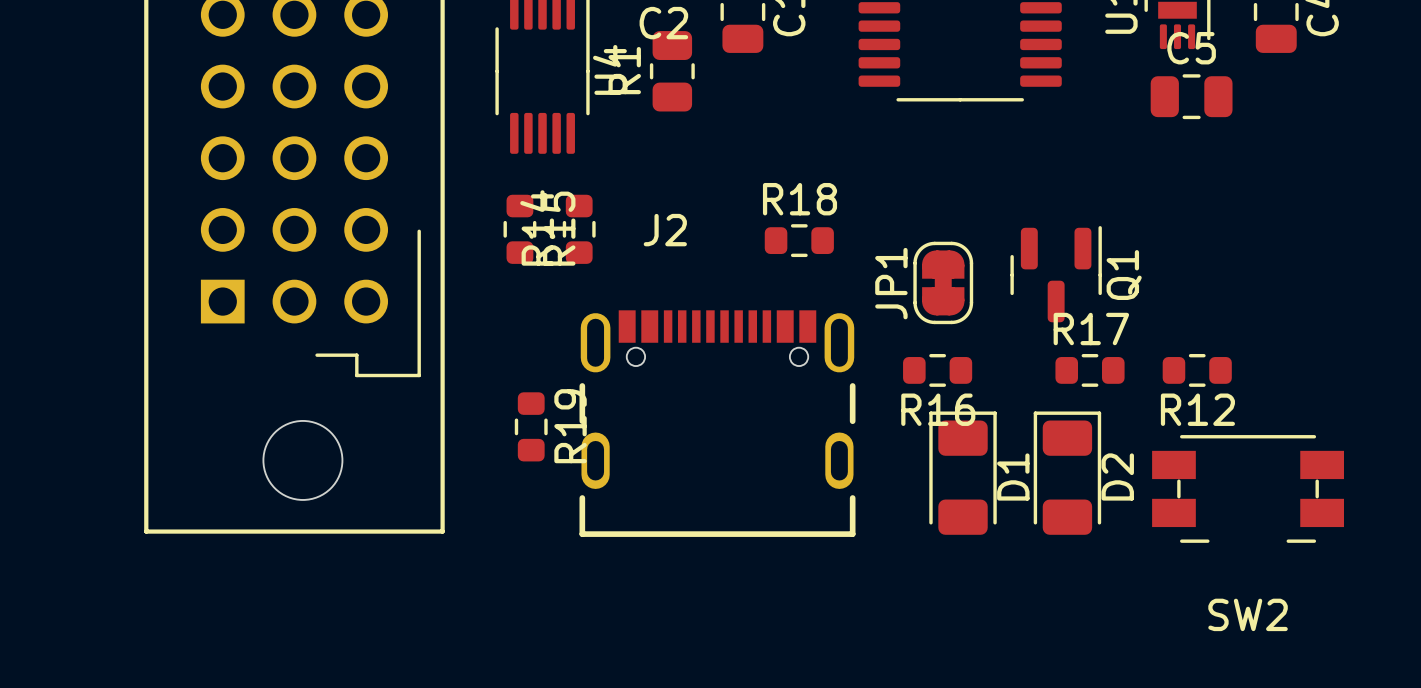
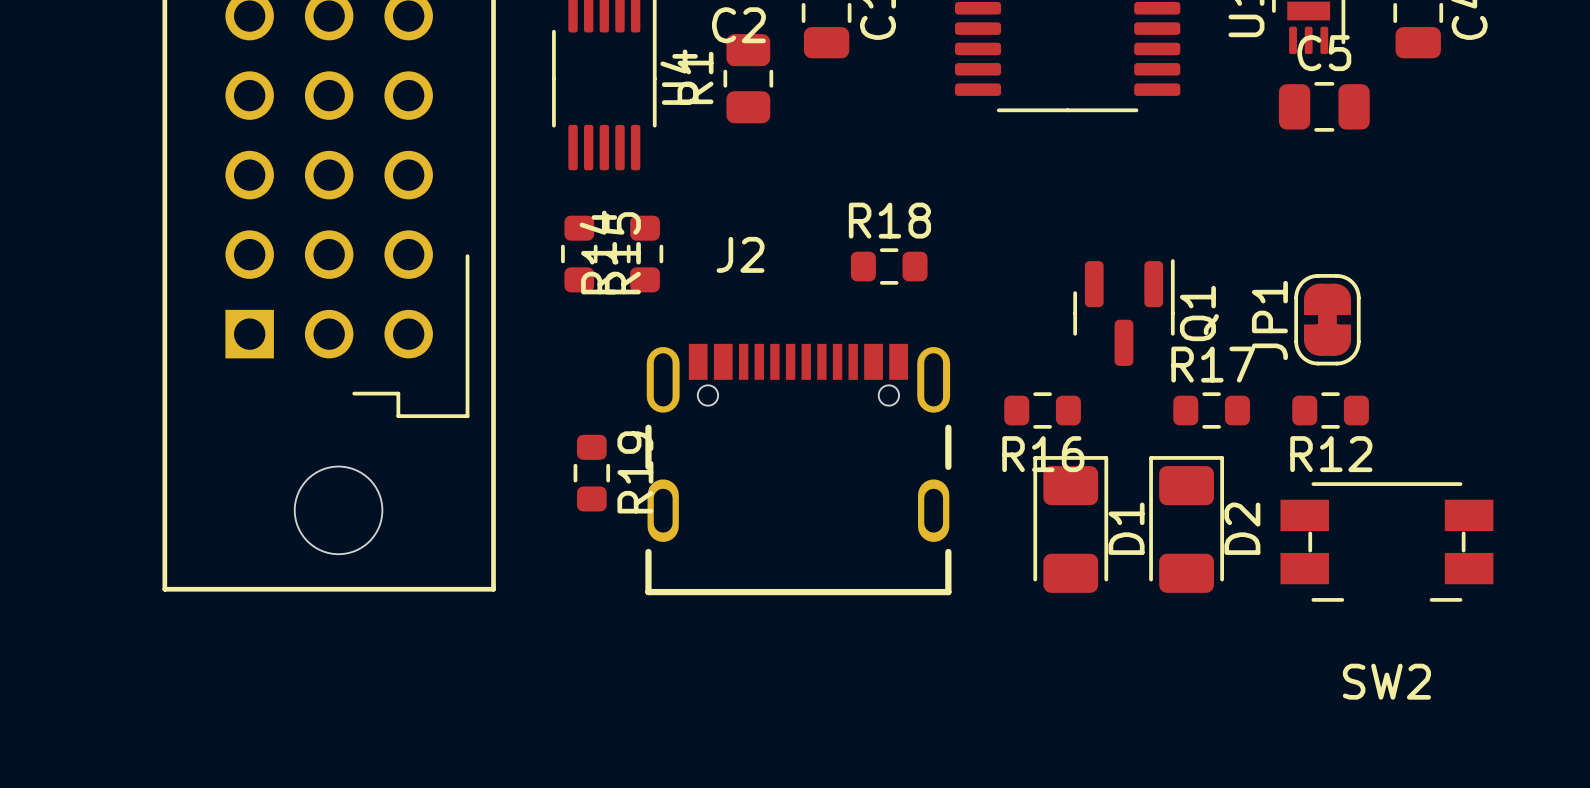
Q1 position: (1056, 274) -> (1123, 312)
JP1 position: (943, 282) -> (1327, 319)

